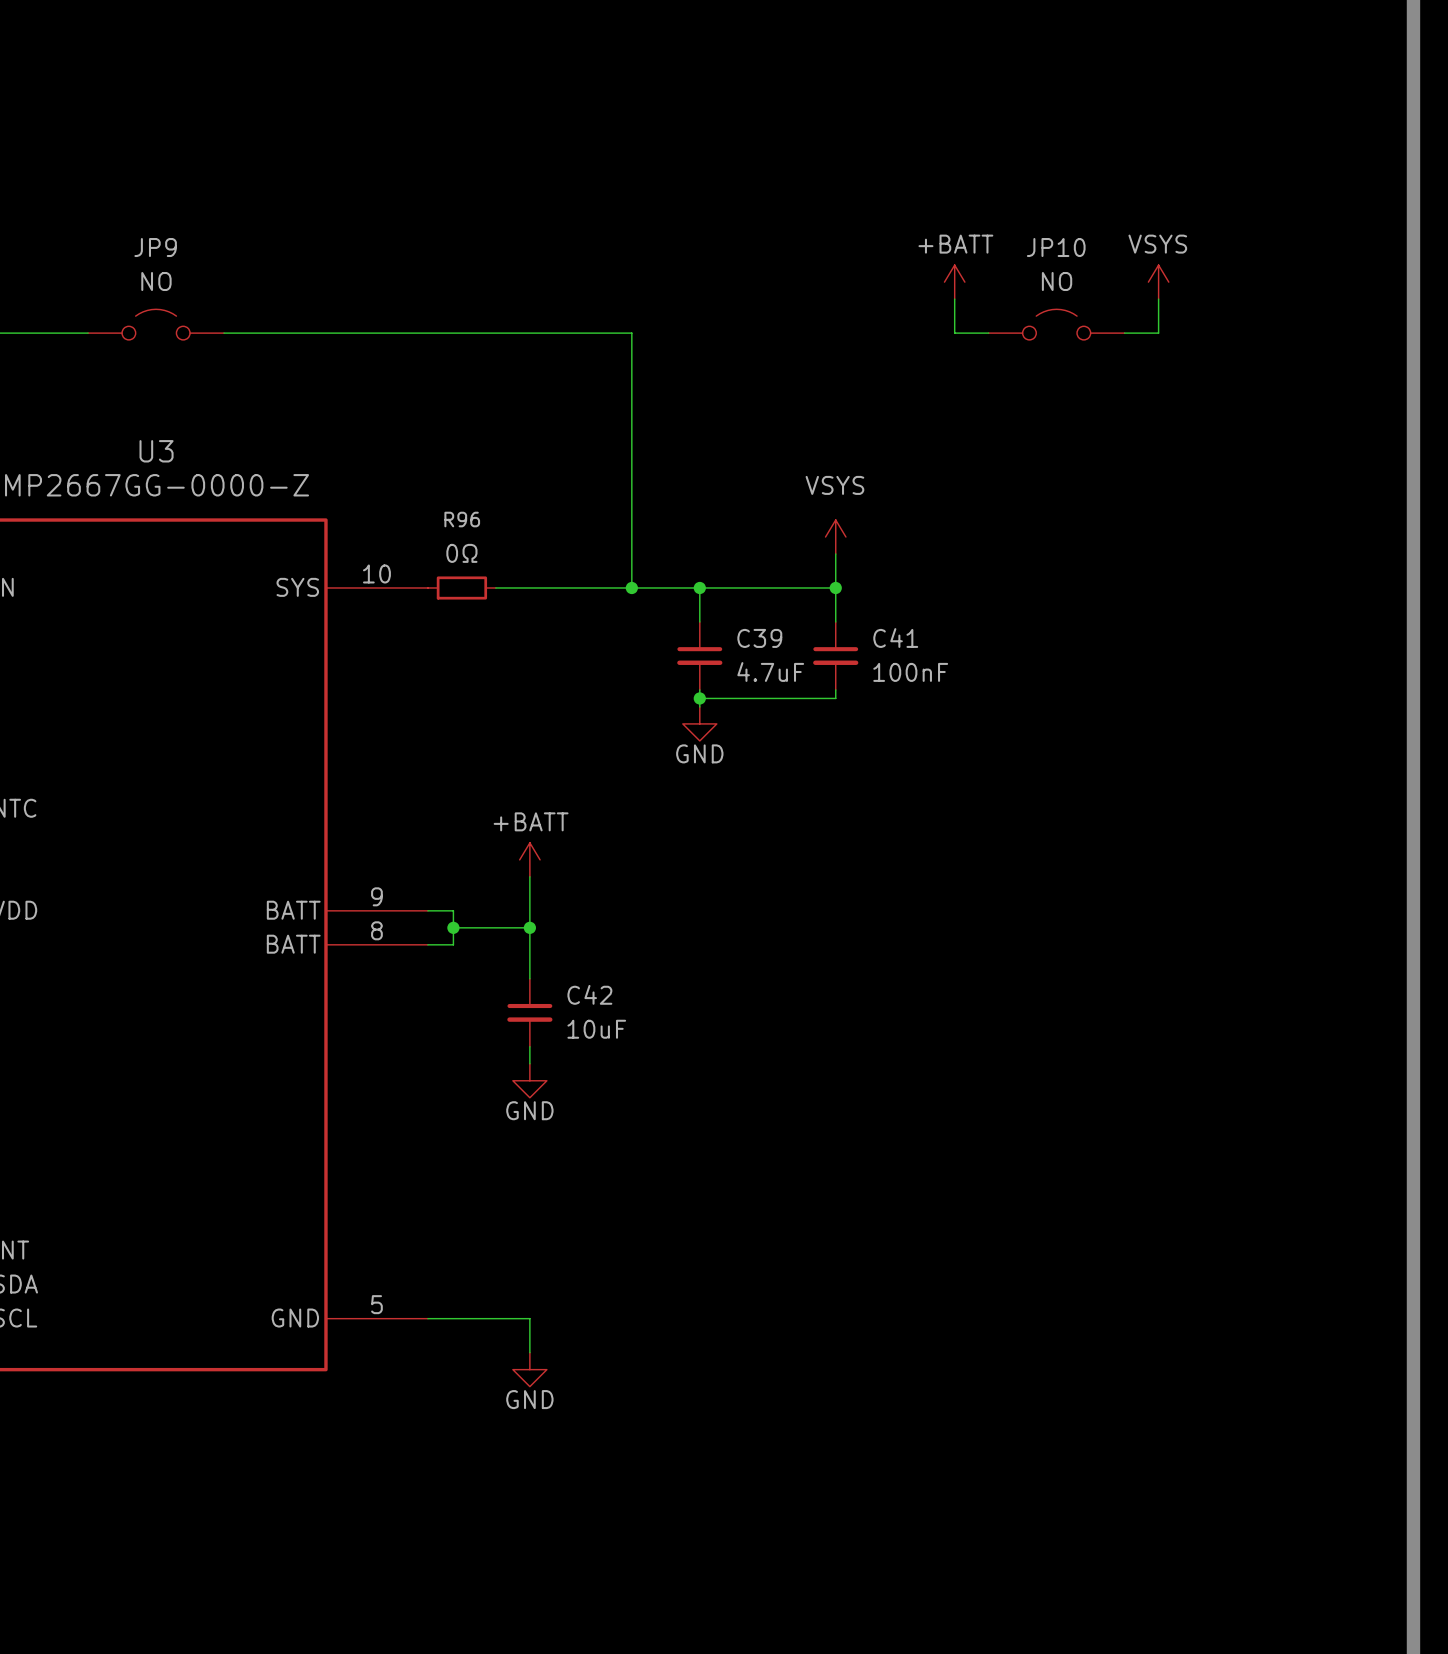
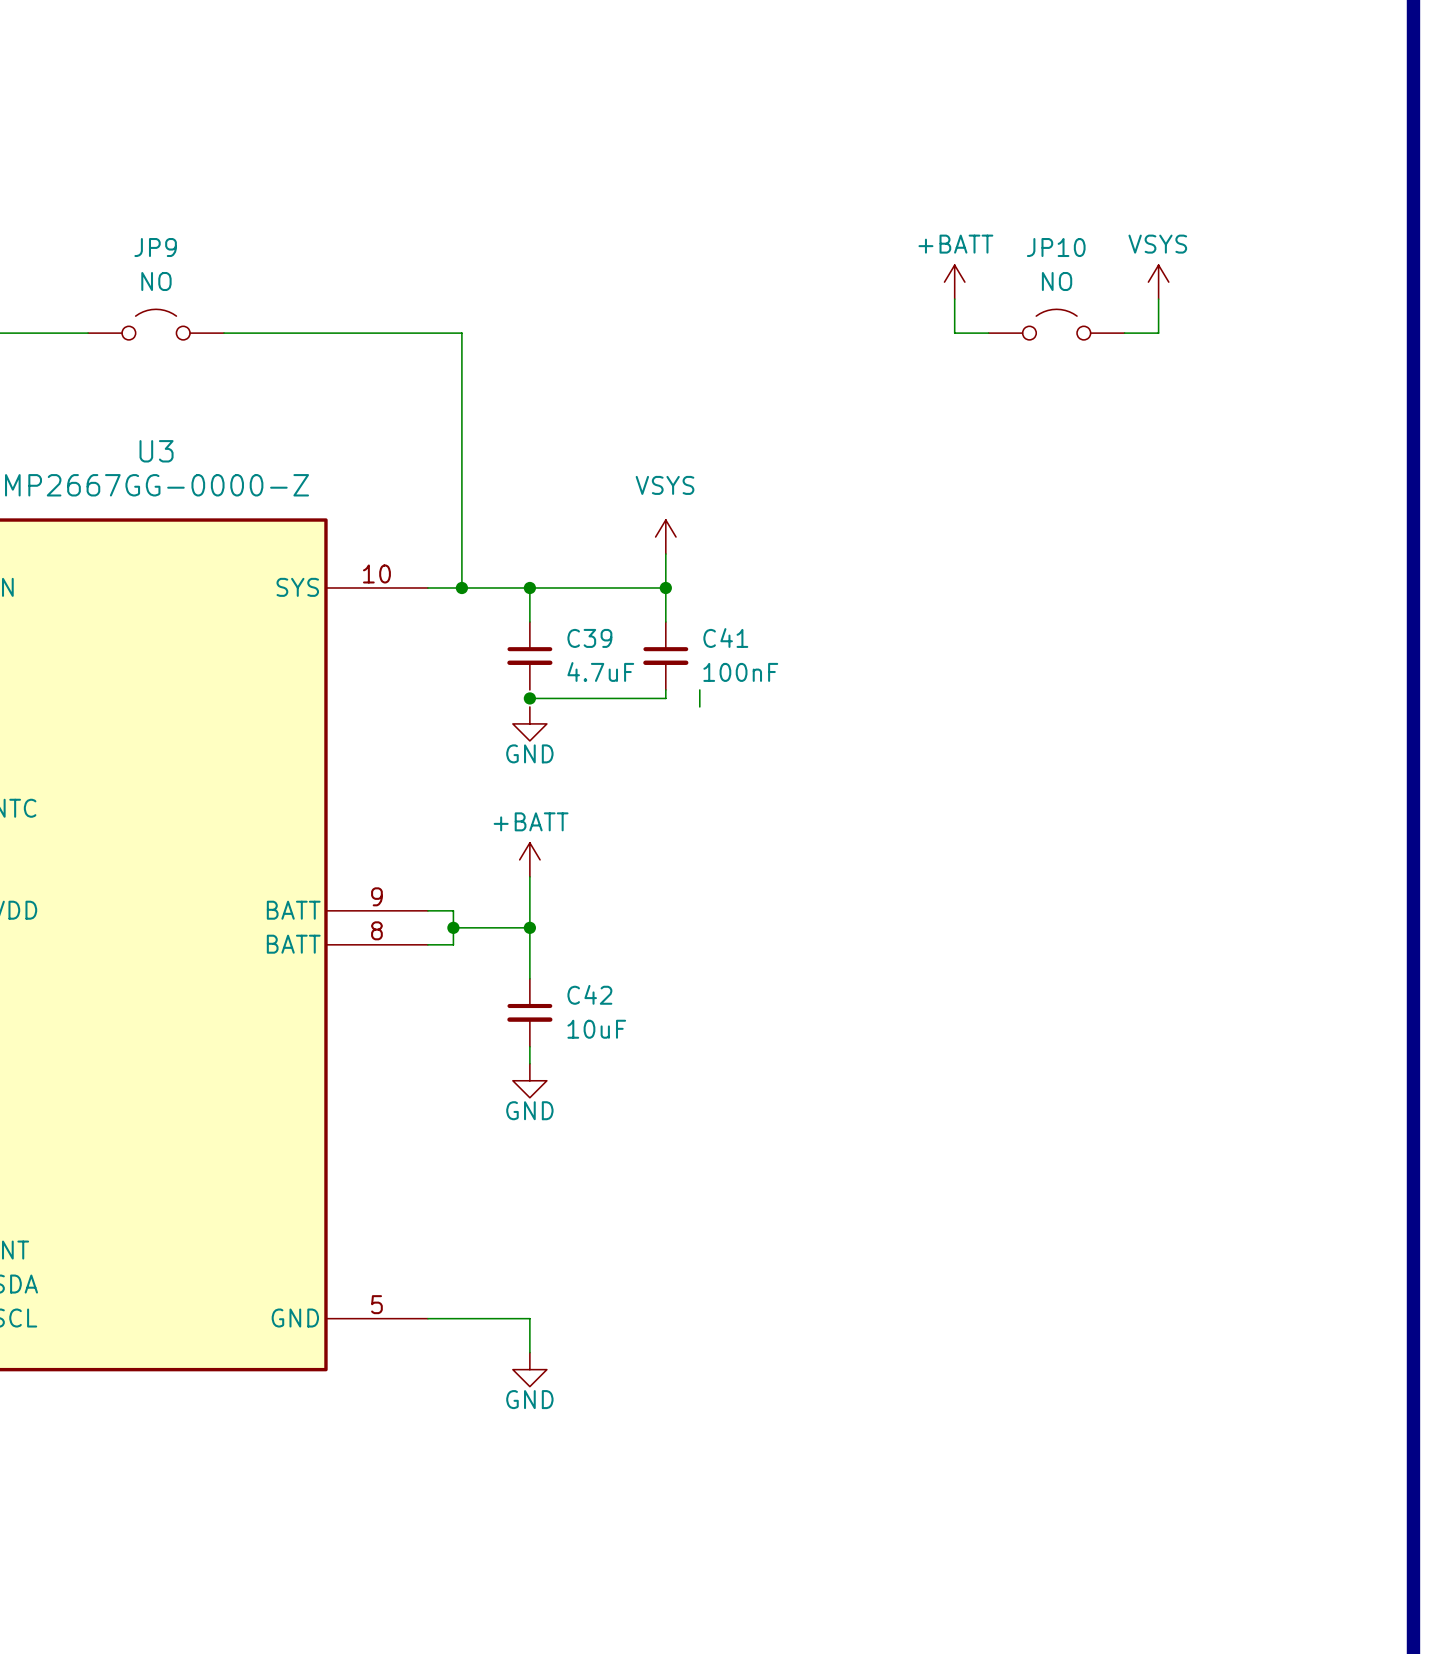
wire: (461, 333) (631, 333) (631, 587) -> (461, 333) (461, 587)
power symbol position: VSYS (835, 537) -> VSYS (665, 537)
wire: (835, 554) (835, 621) -> (665, 554) (665, 621)
wire: none -> (427, 587) (495, 587)
junction: none -> (461, 587)
R96: 0Ω (461, 587) -> none
junction: none -> (529, 587)
junction: (631, 587) -> none
wire: (665, 587) (835, 587) -> none
junction: none -> (665, 587)
wire: (699, 587) (699, 621) -> (529, 587) (529, 621)
junction: (699, 587) -> none
junction: (835, 587) -> none
C39 position: (699, 655) -> (529, 655)
C41 position: (835, 655) -> (665, 655)
wire: (835, 689) (835, 698) (699, 698) -> (665, 689) (665, 698) (529, 698)
junction: none -> (529, 698)
junction: (699, 698) -> none
power symbol position: GND (699, 723) -> GND (529, 723)

